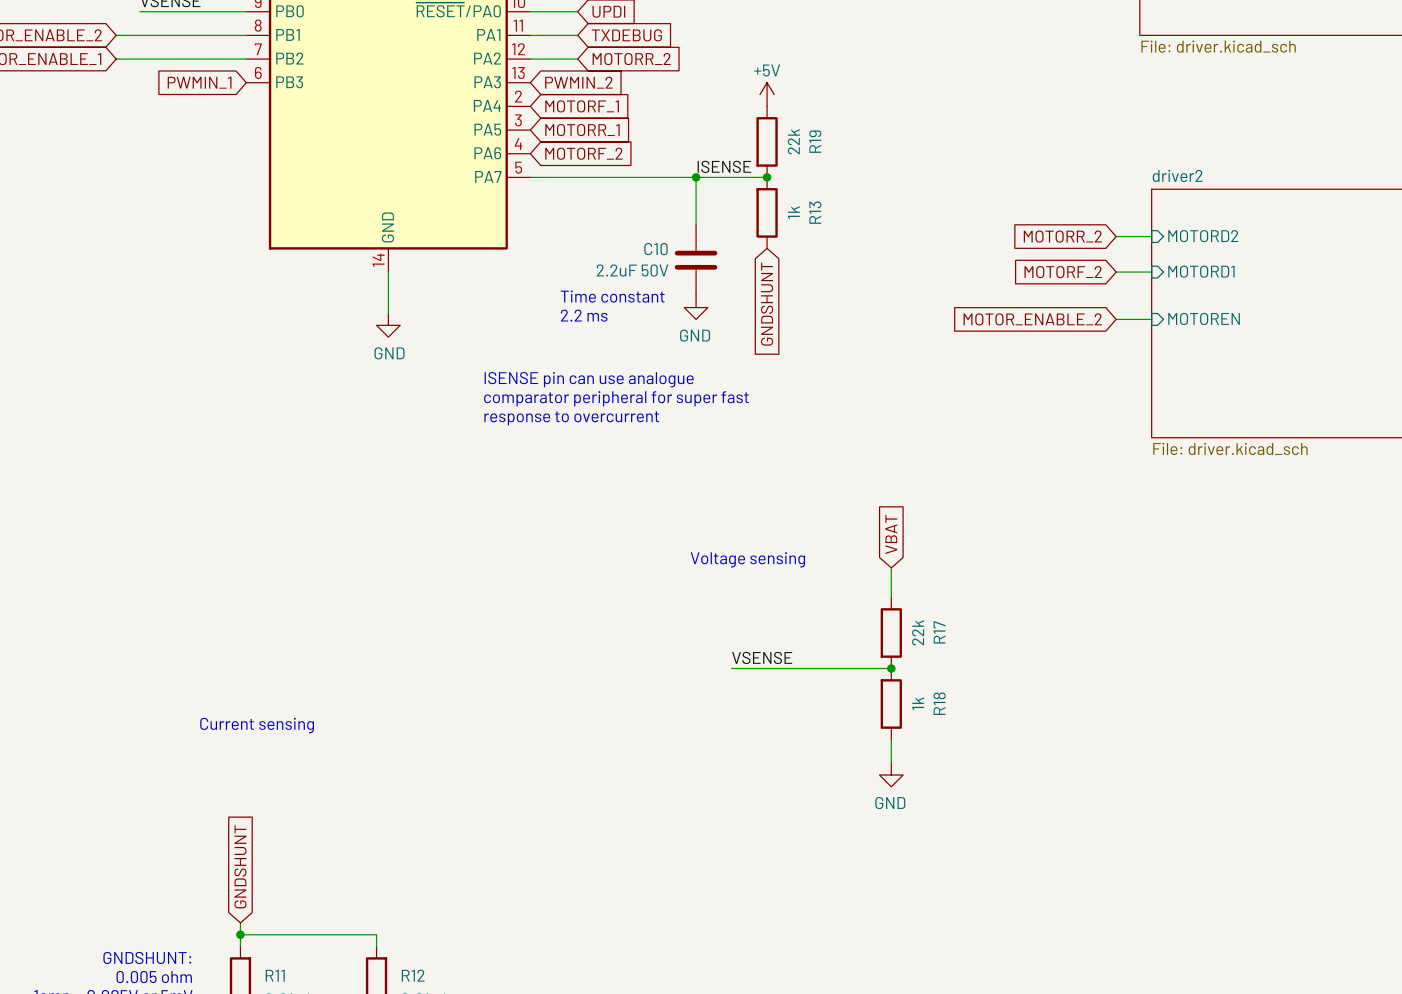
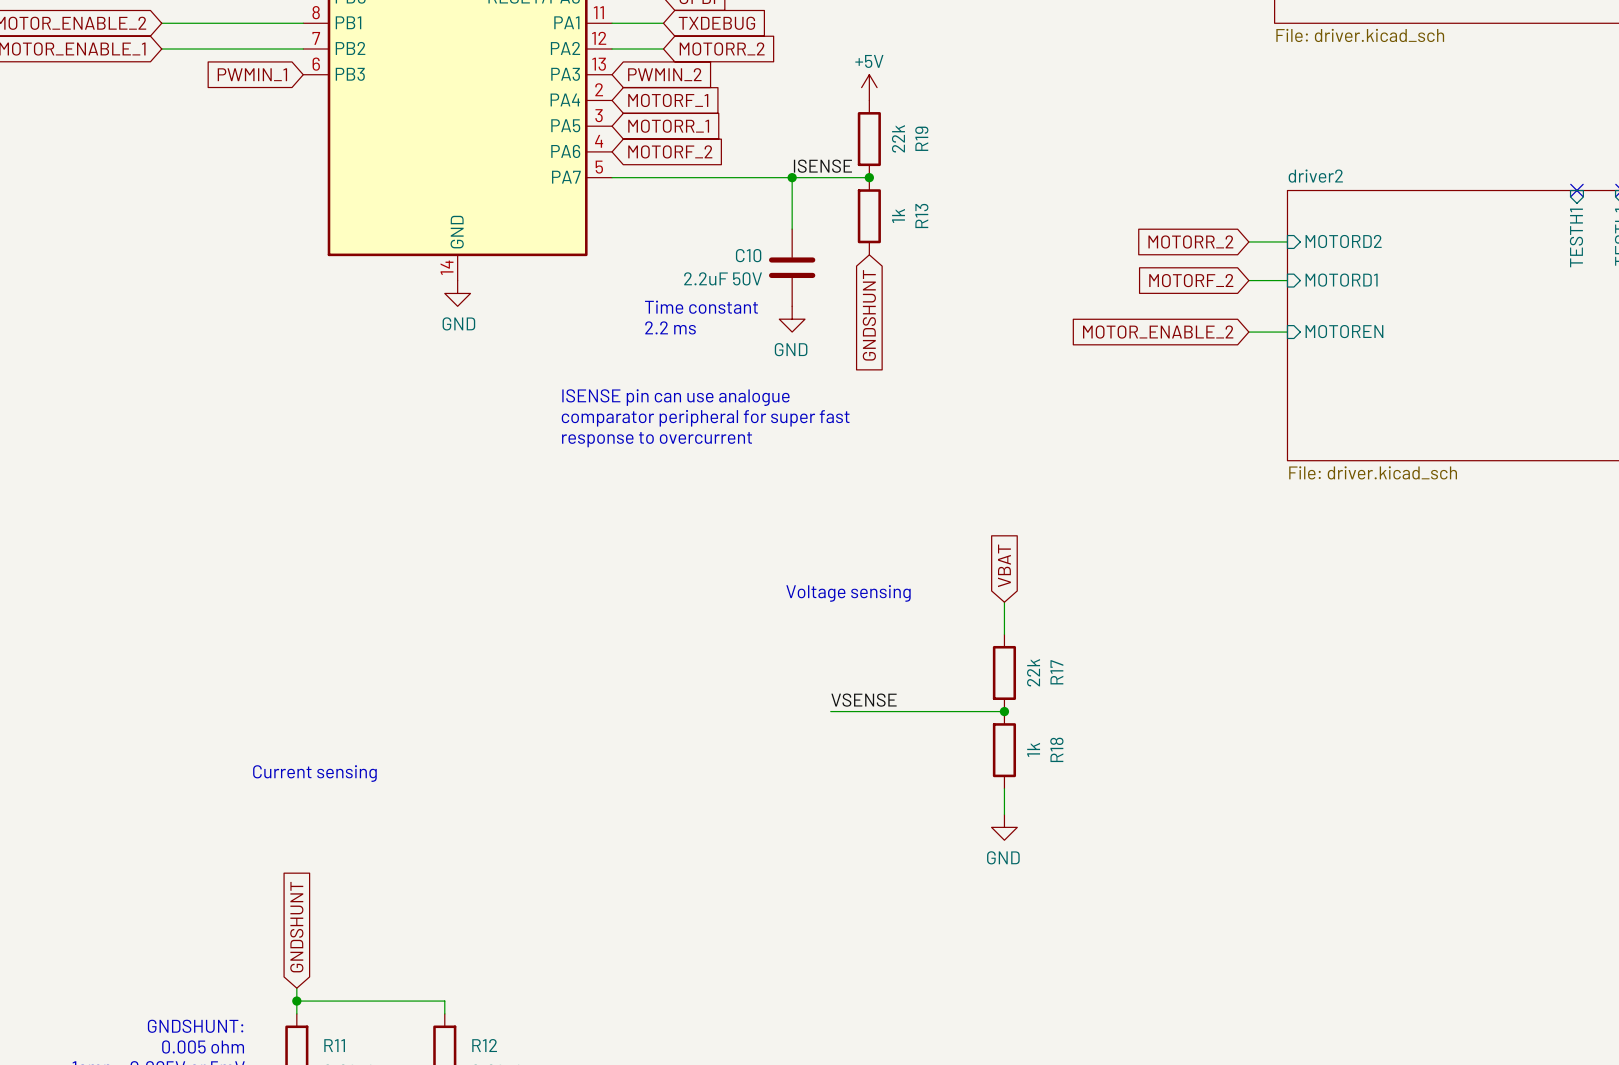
wire: (388, 272) (388, 313) -> none
power symbol position: GND (388, 325) -> GND (457, 293)

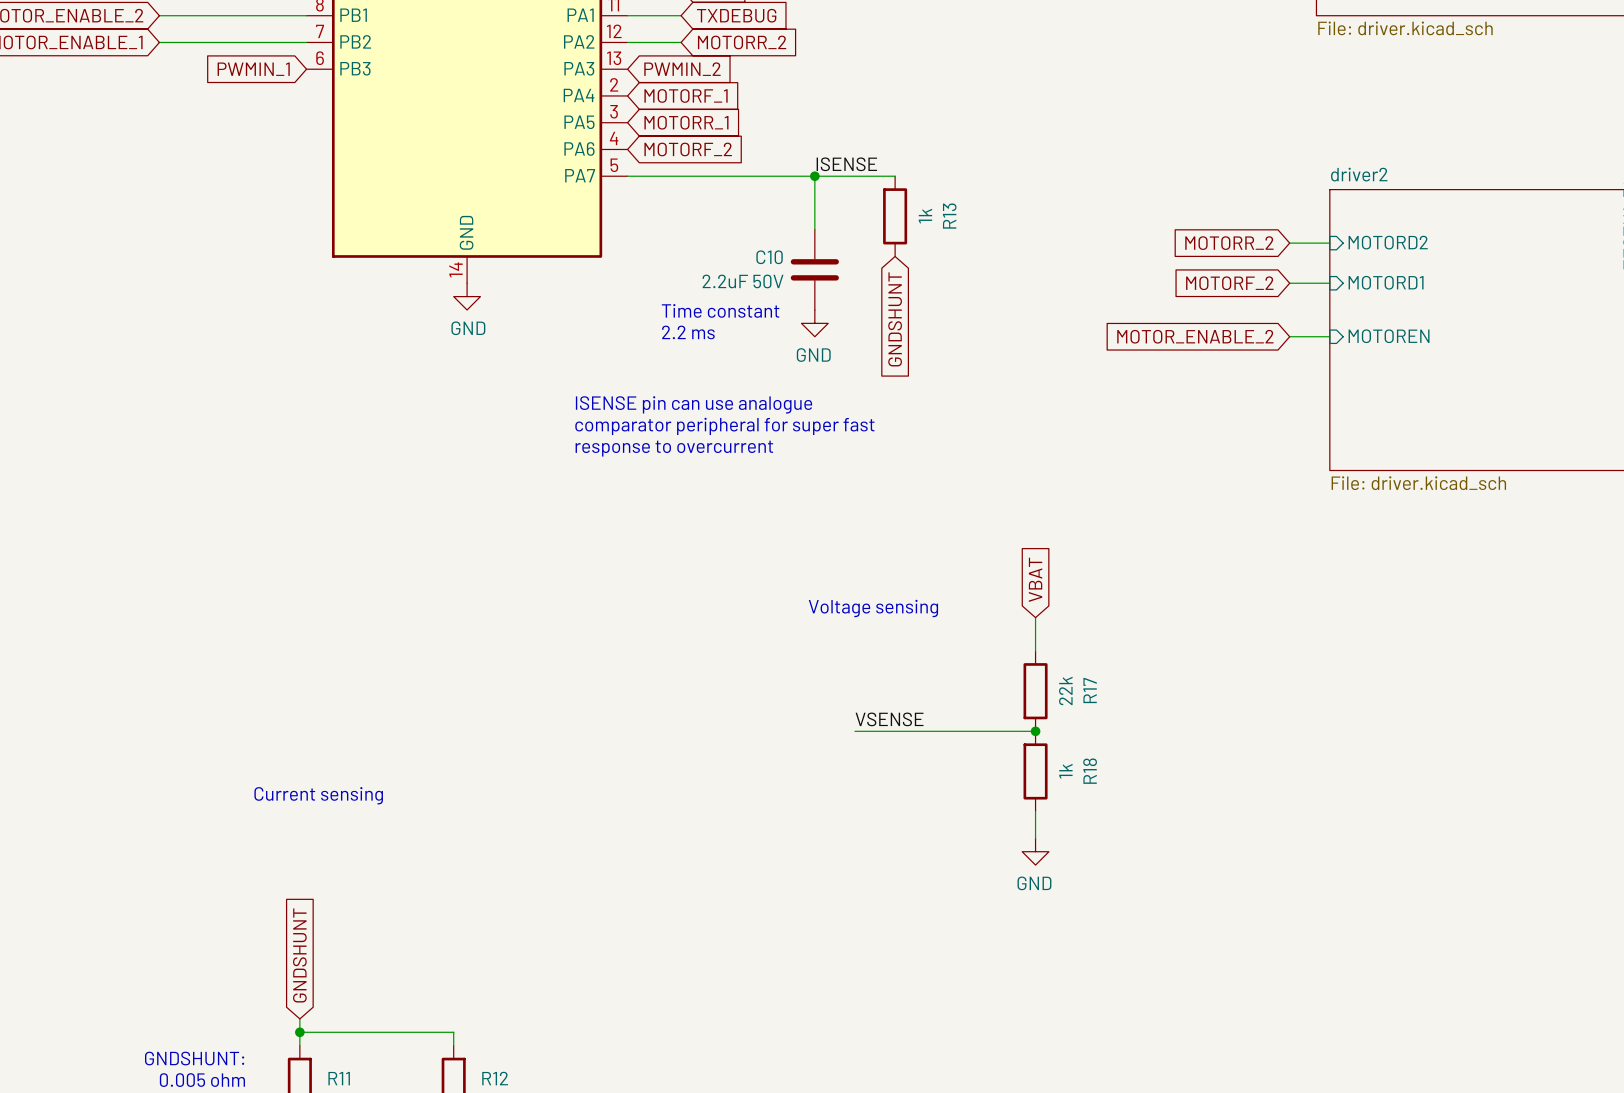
power symbol: +5V (869, 87) -> none
R19: 22k (869, 139) -> none
junction: (869, 177) -> none

